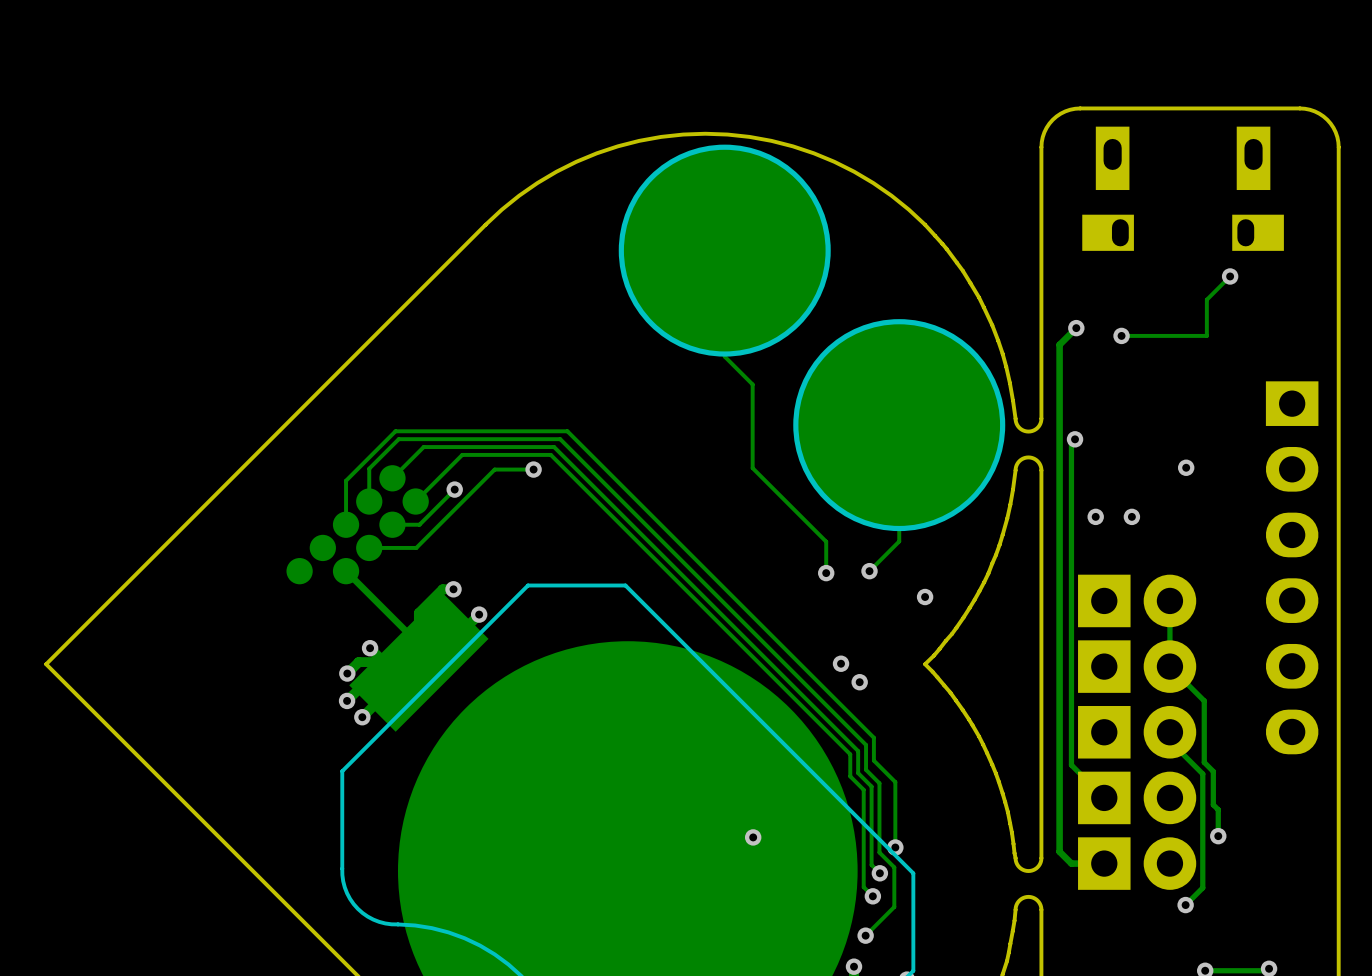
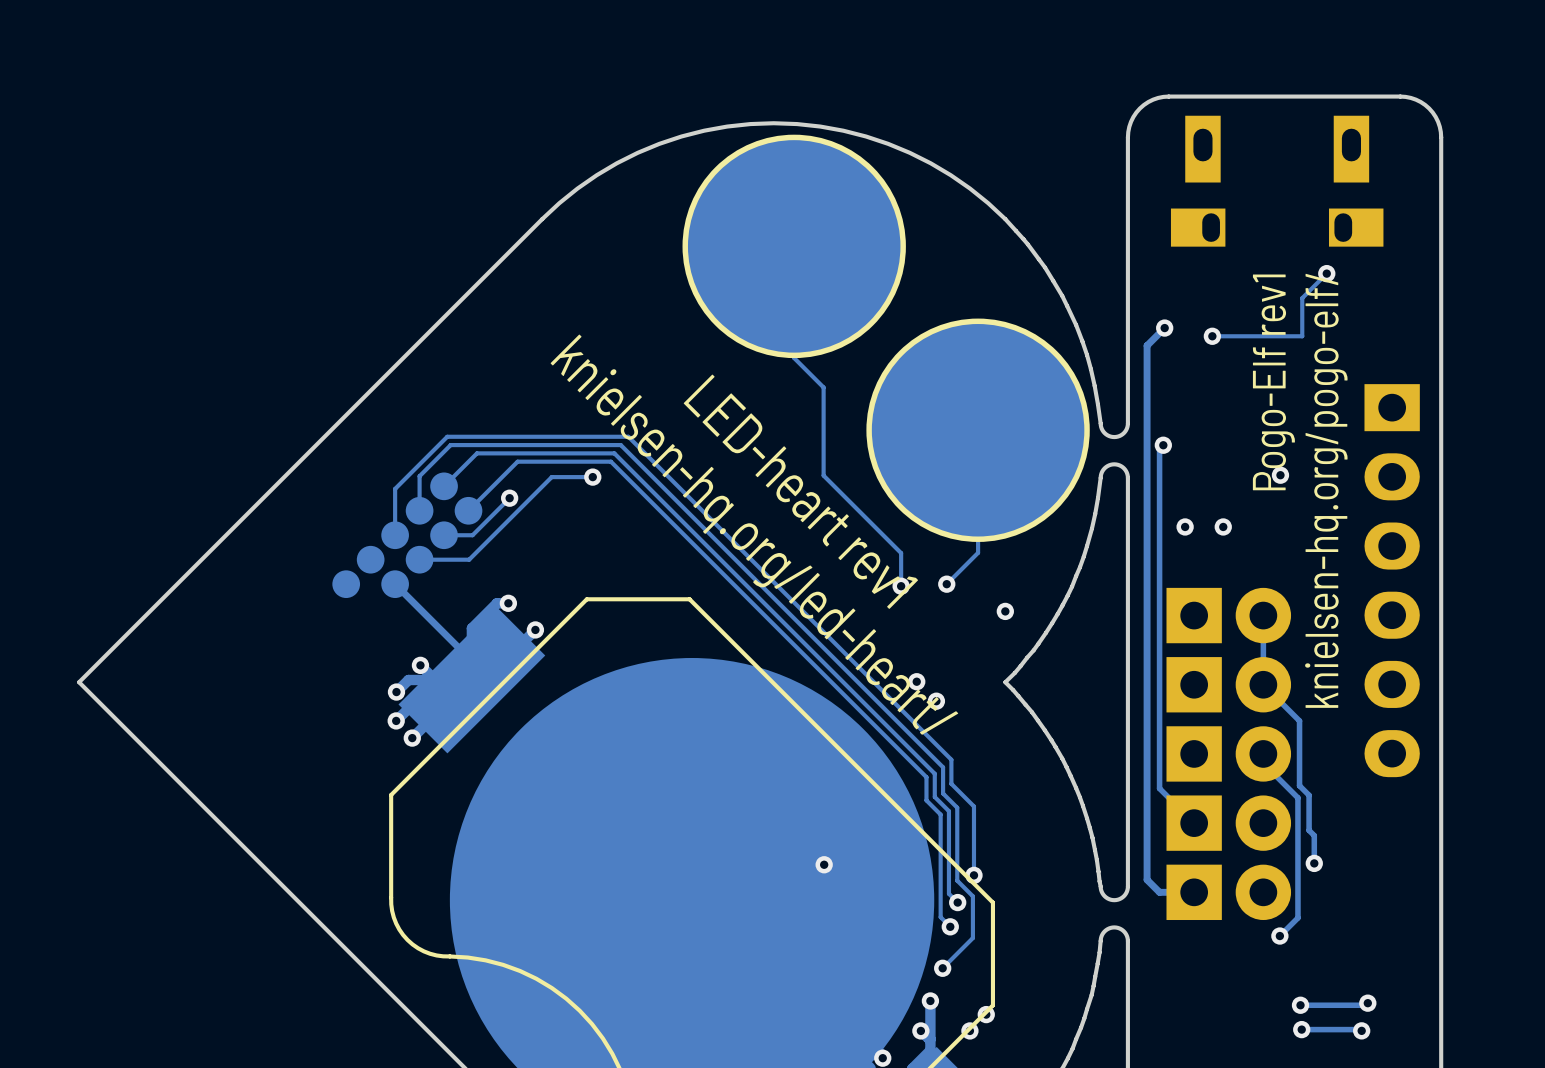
text: none -> Pogo-Elf rev1 (1273, 382)
text: none -> LED-heart rev1 (800, 491)
text: none -> knielsen-hq.org/led-heart/ (754, 534)
text: none -> knielsen-hq.org/pogo-elf/ (1326, 490)

